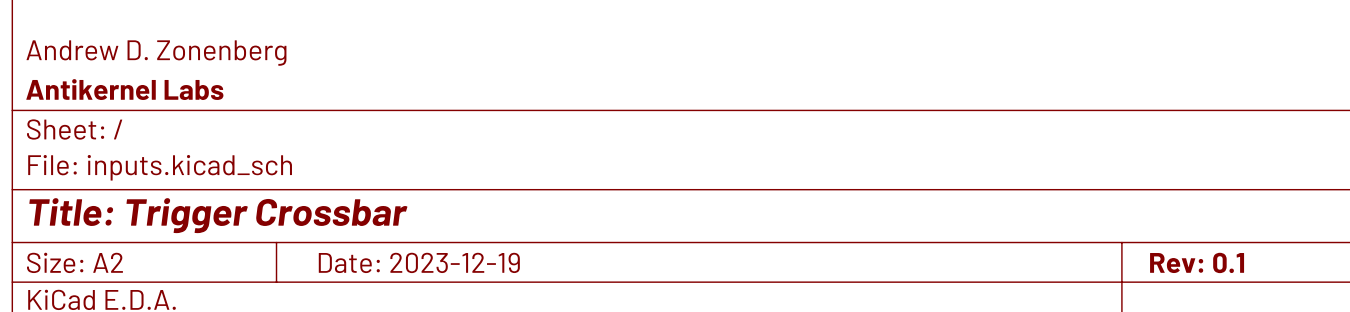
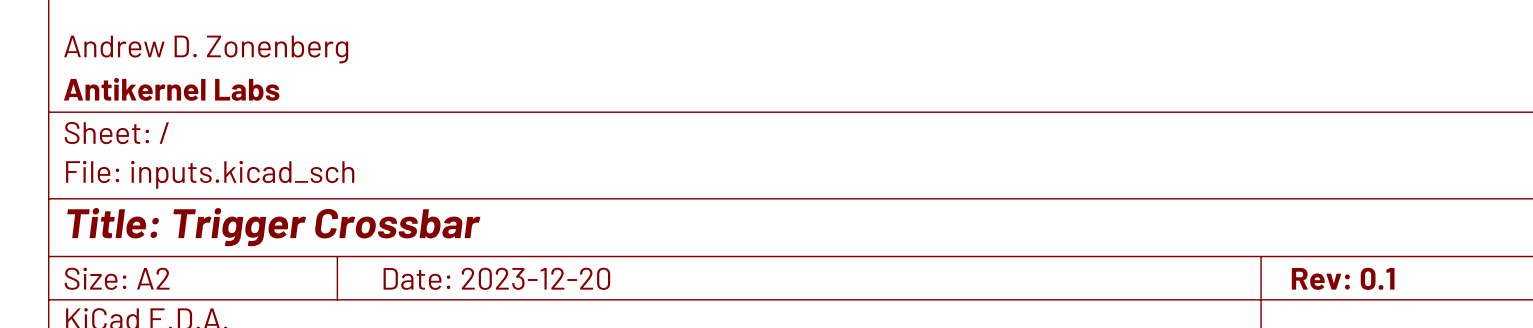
title block: Date: 2023-12-19 (419, 262) -> Date: 2023-12-20 (496, 278)

